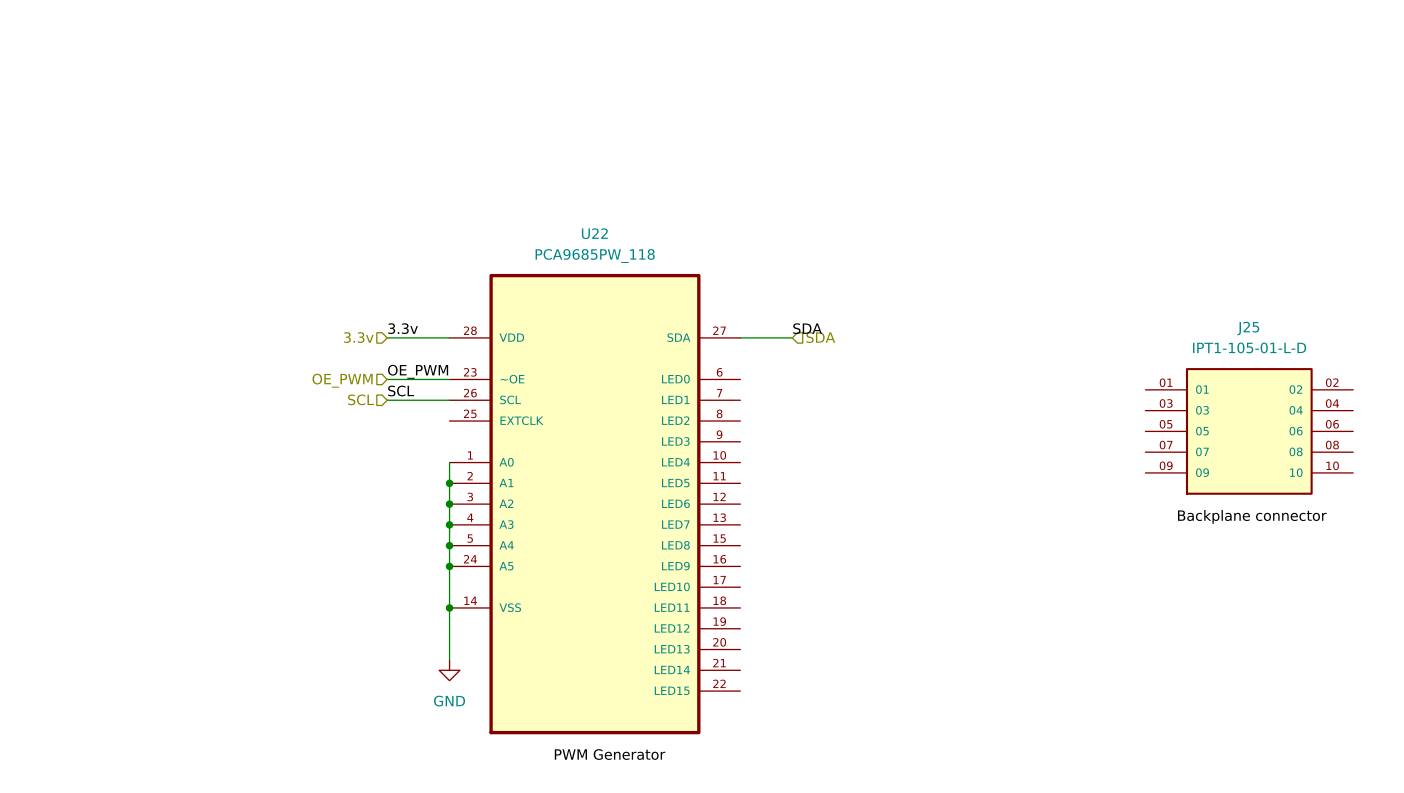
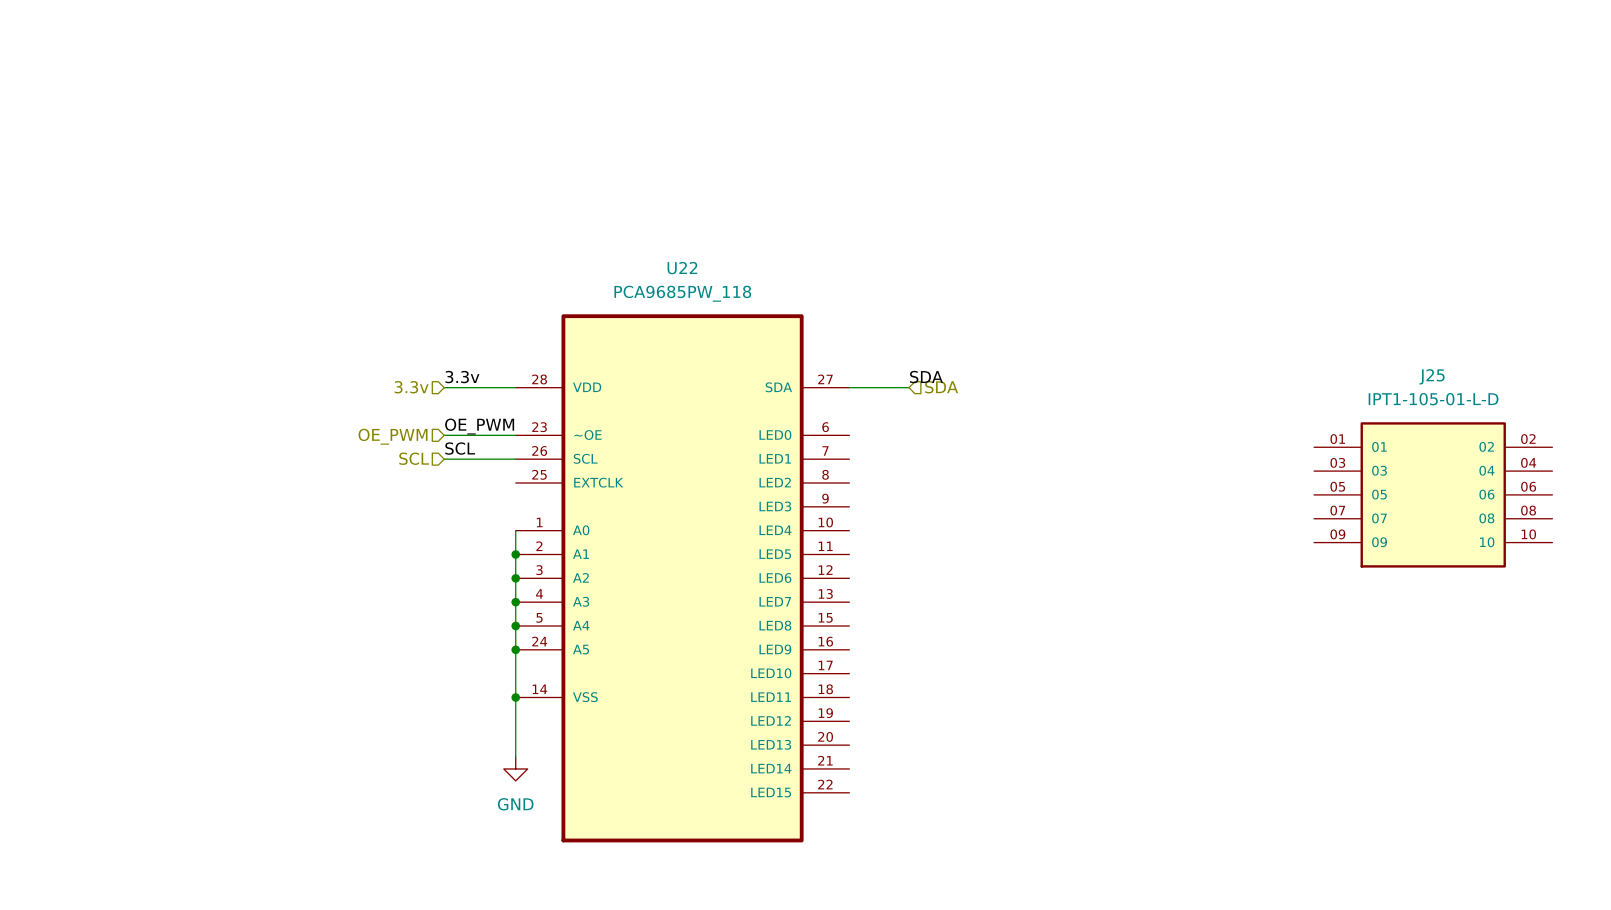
label: Backplane connector (1252, 516) -> none
label: PWM Generator (610, 754) -> none

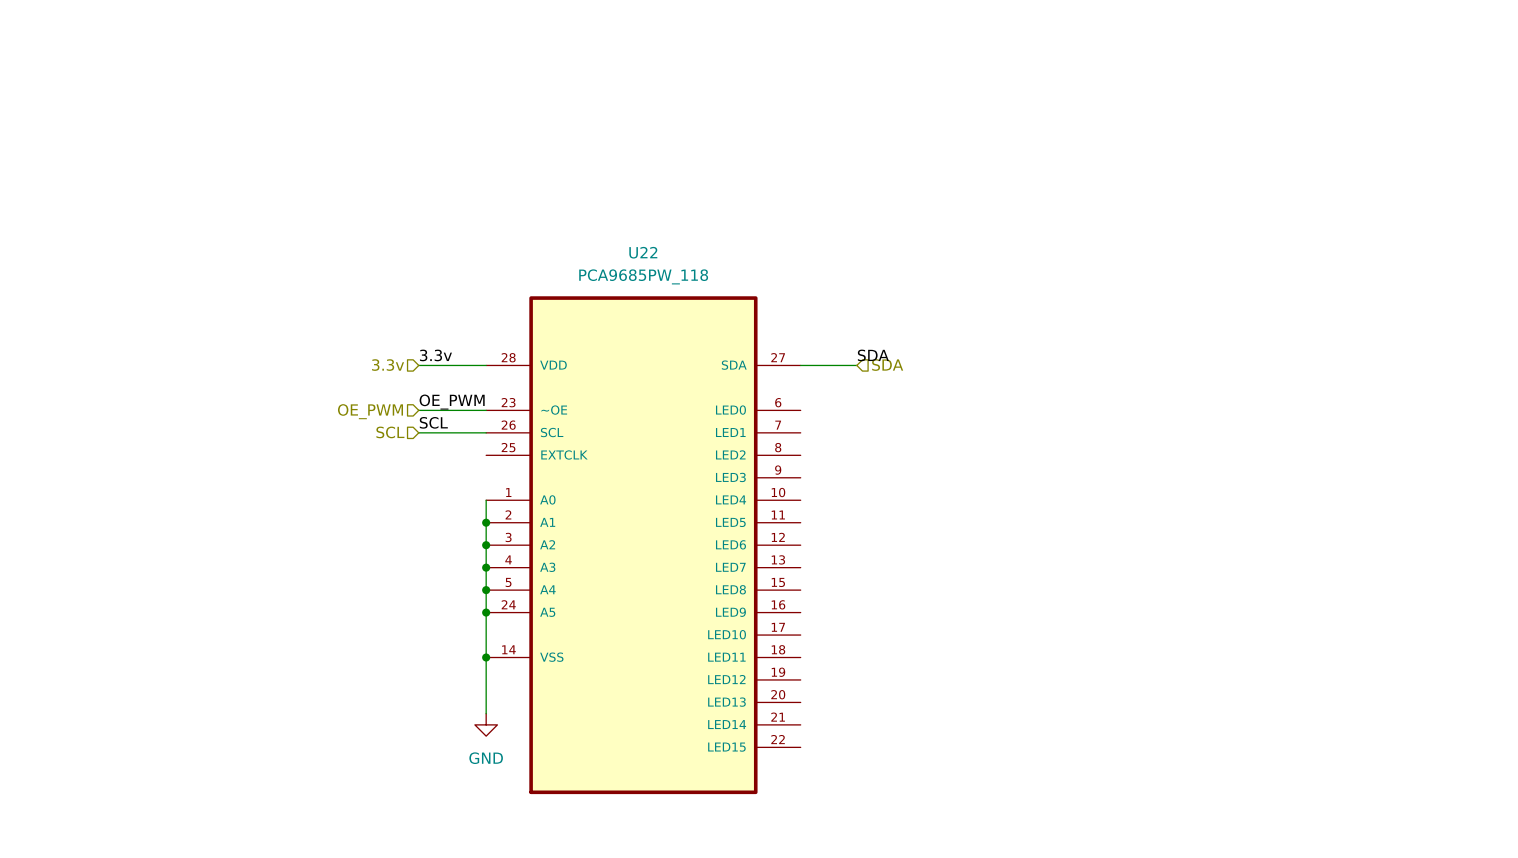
J25: IPT1-105-01-L-D (1433, 494) -> none

